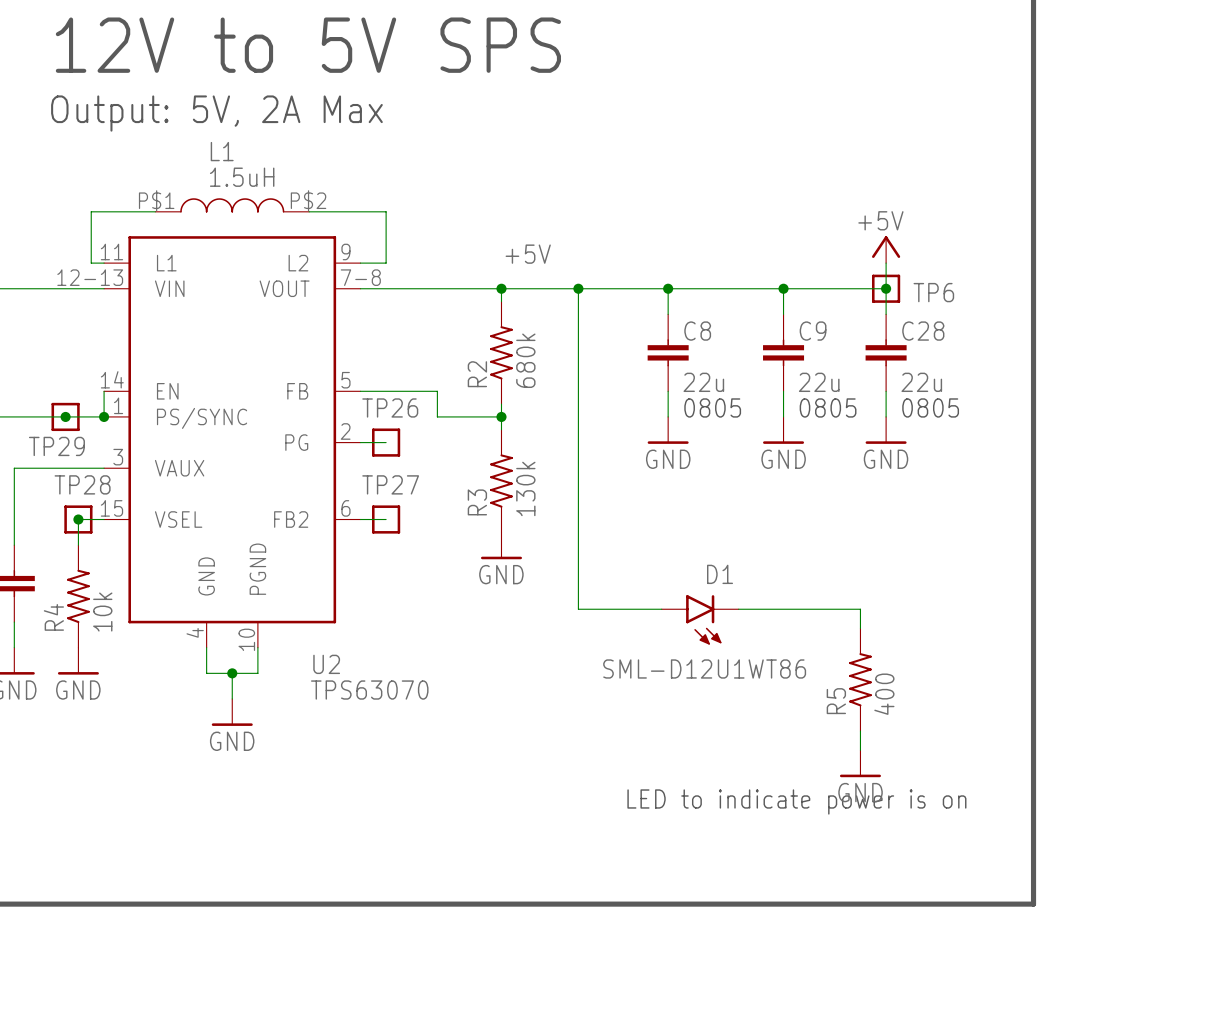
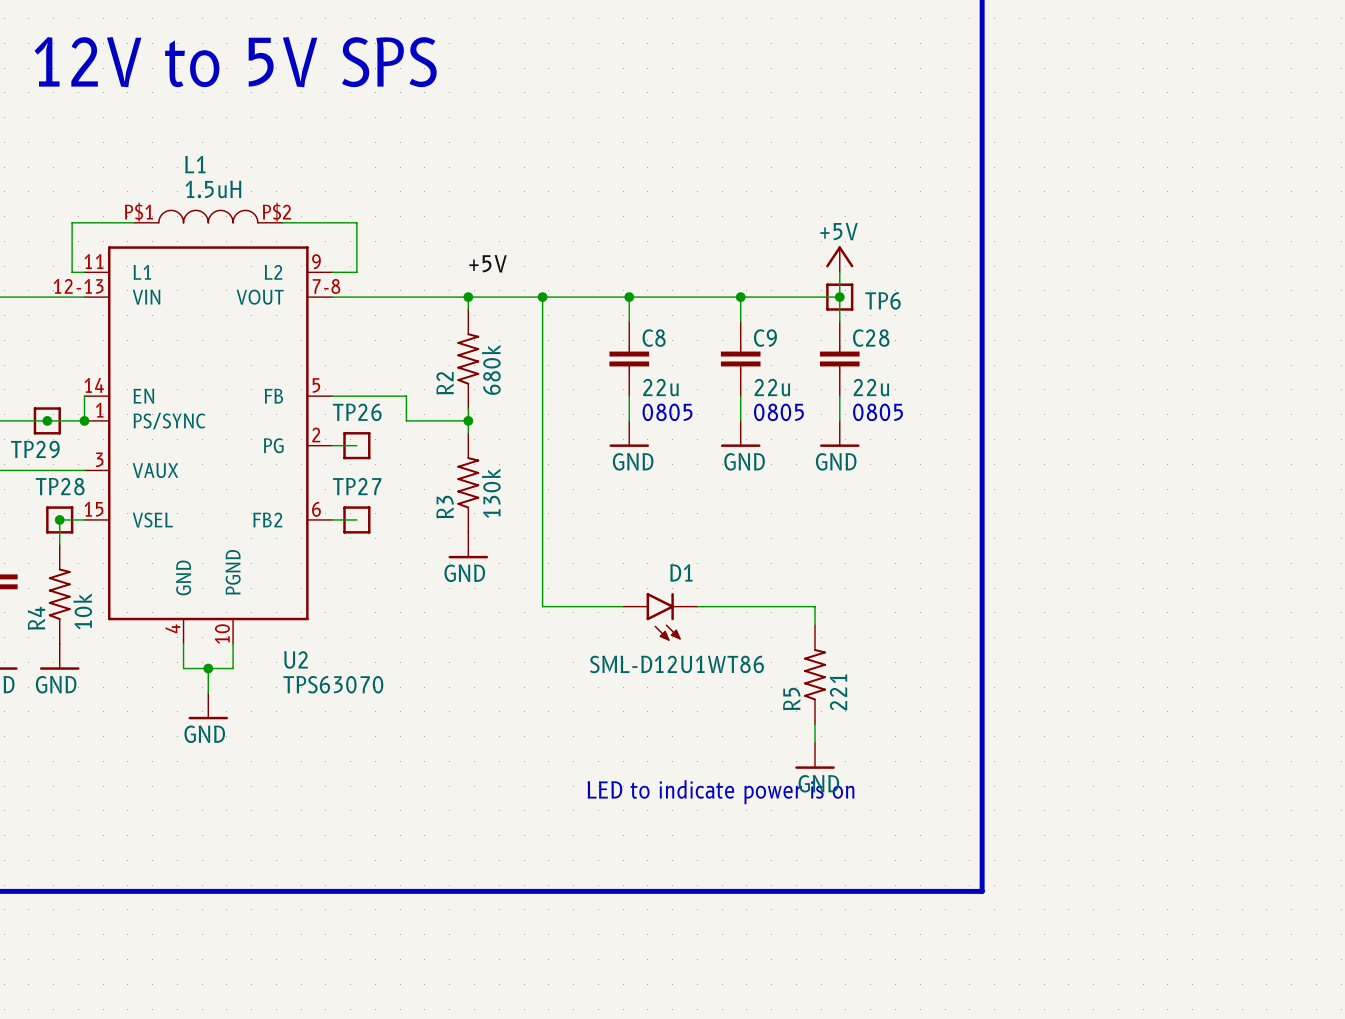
text: Output: 5V, 2A Max (216, 113) -> none
R5 value: 400 (884, 694) -> 221 (838, 692)

